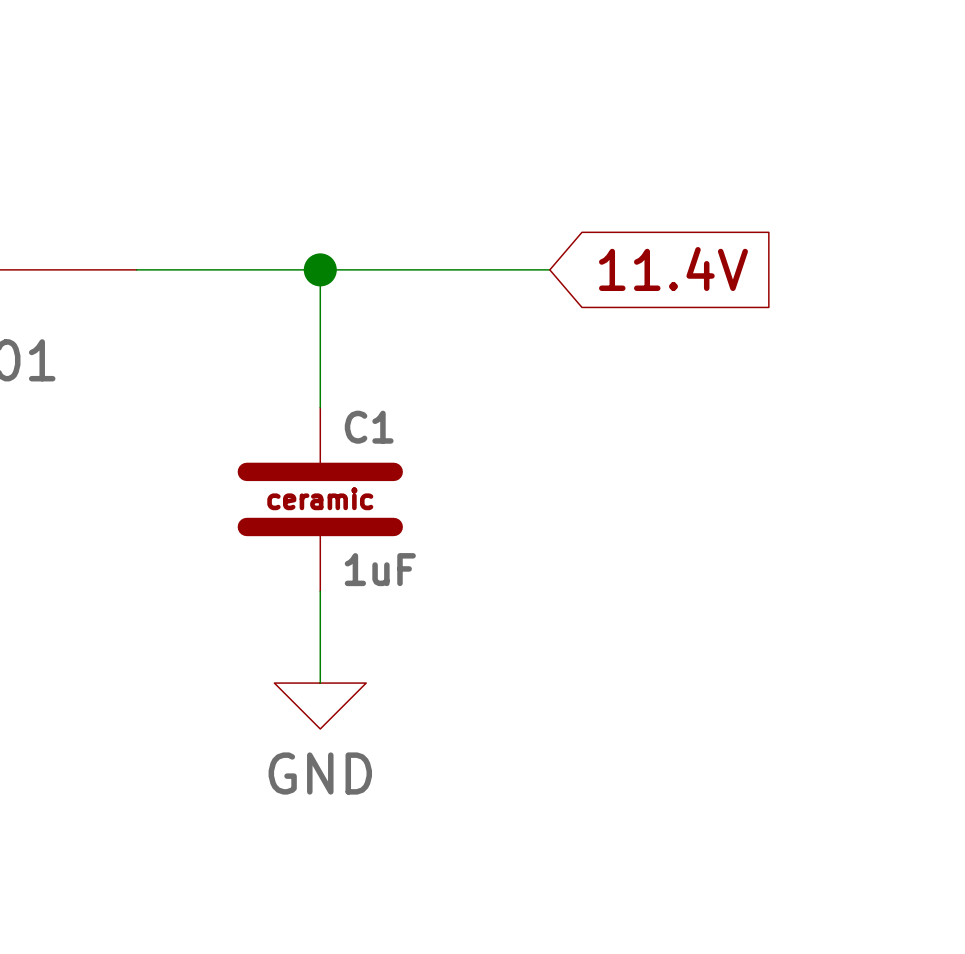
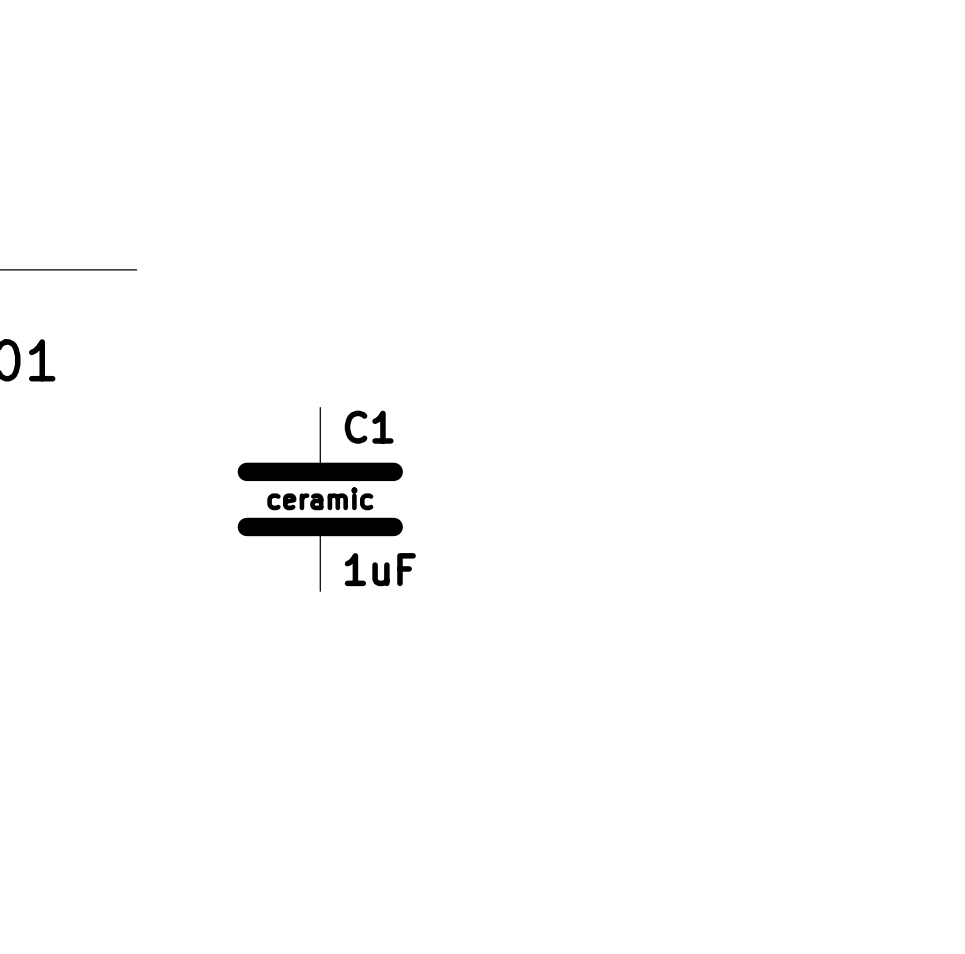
wire: (136, 269) (549, 269) -> none
wire: (320, 269) (320, 407) -> none
junction: (320, 269) -> none
global label: 11.4V (673, 269) -> none
wire: (320, 591) (320, 683) -> none
power symbol: GND (320, 706) -> none

